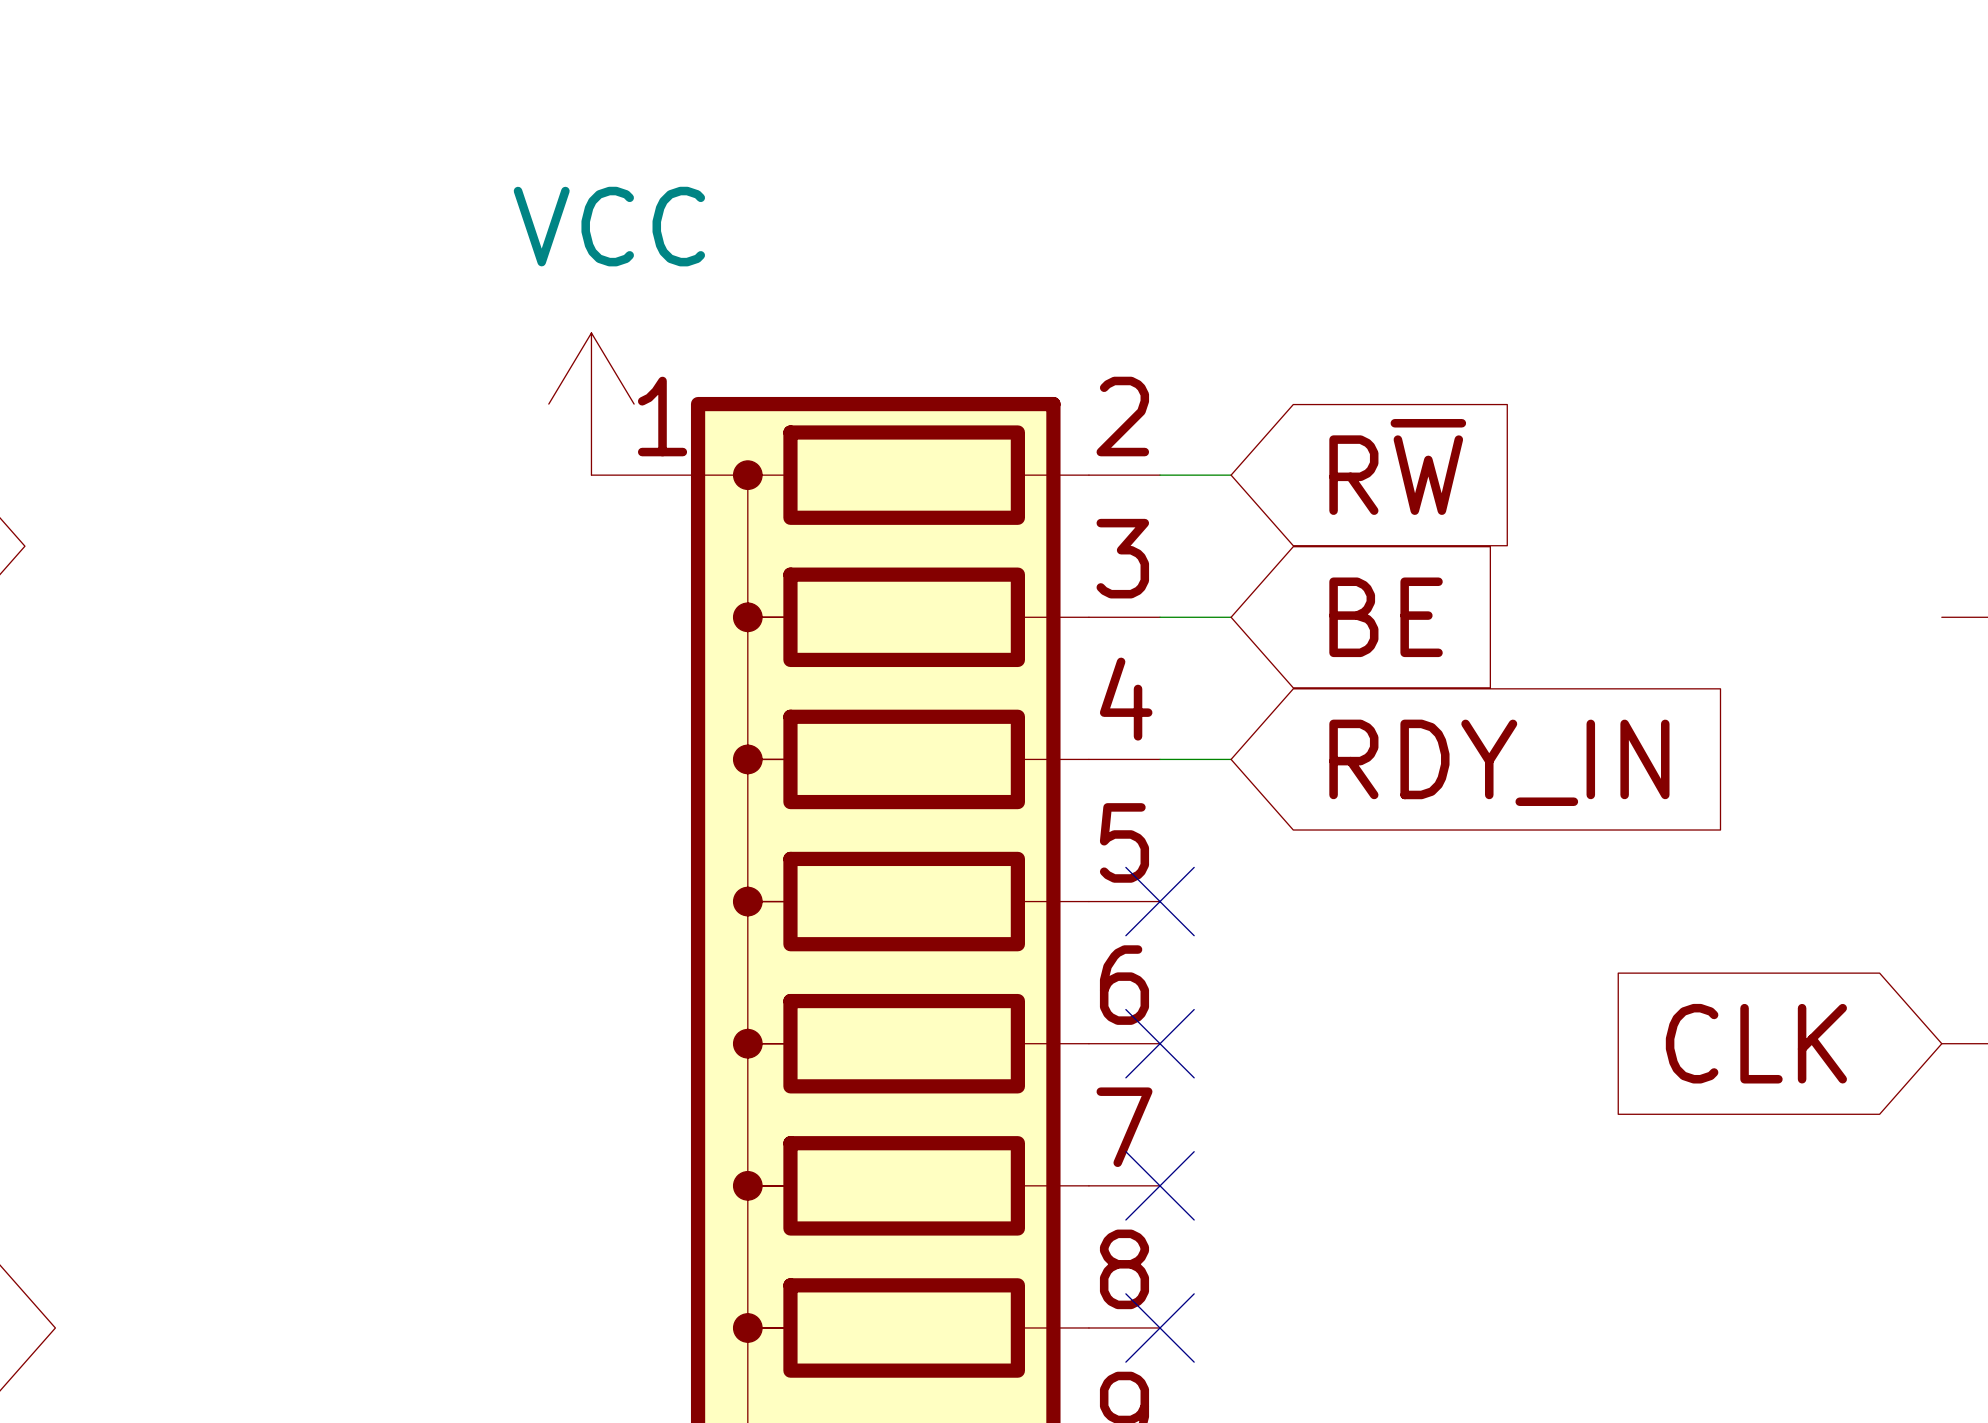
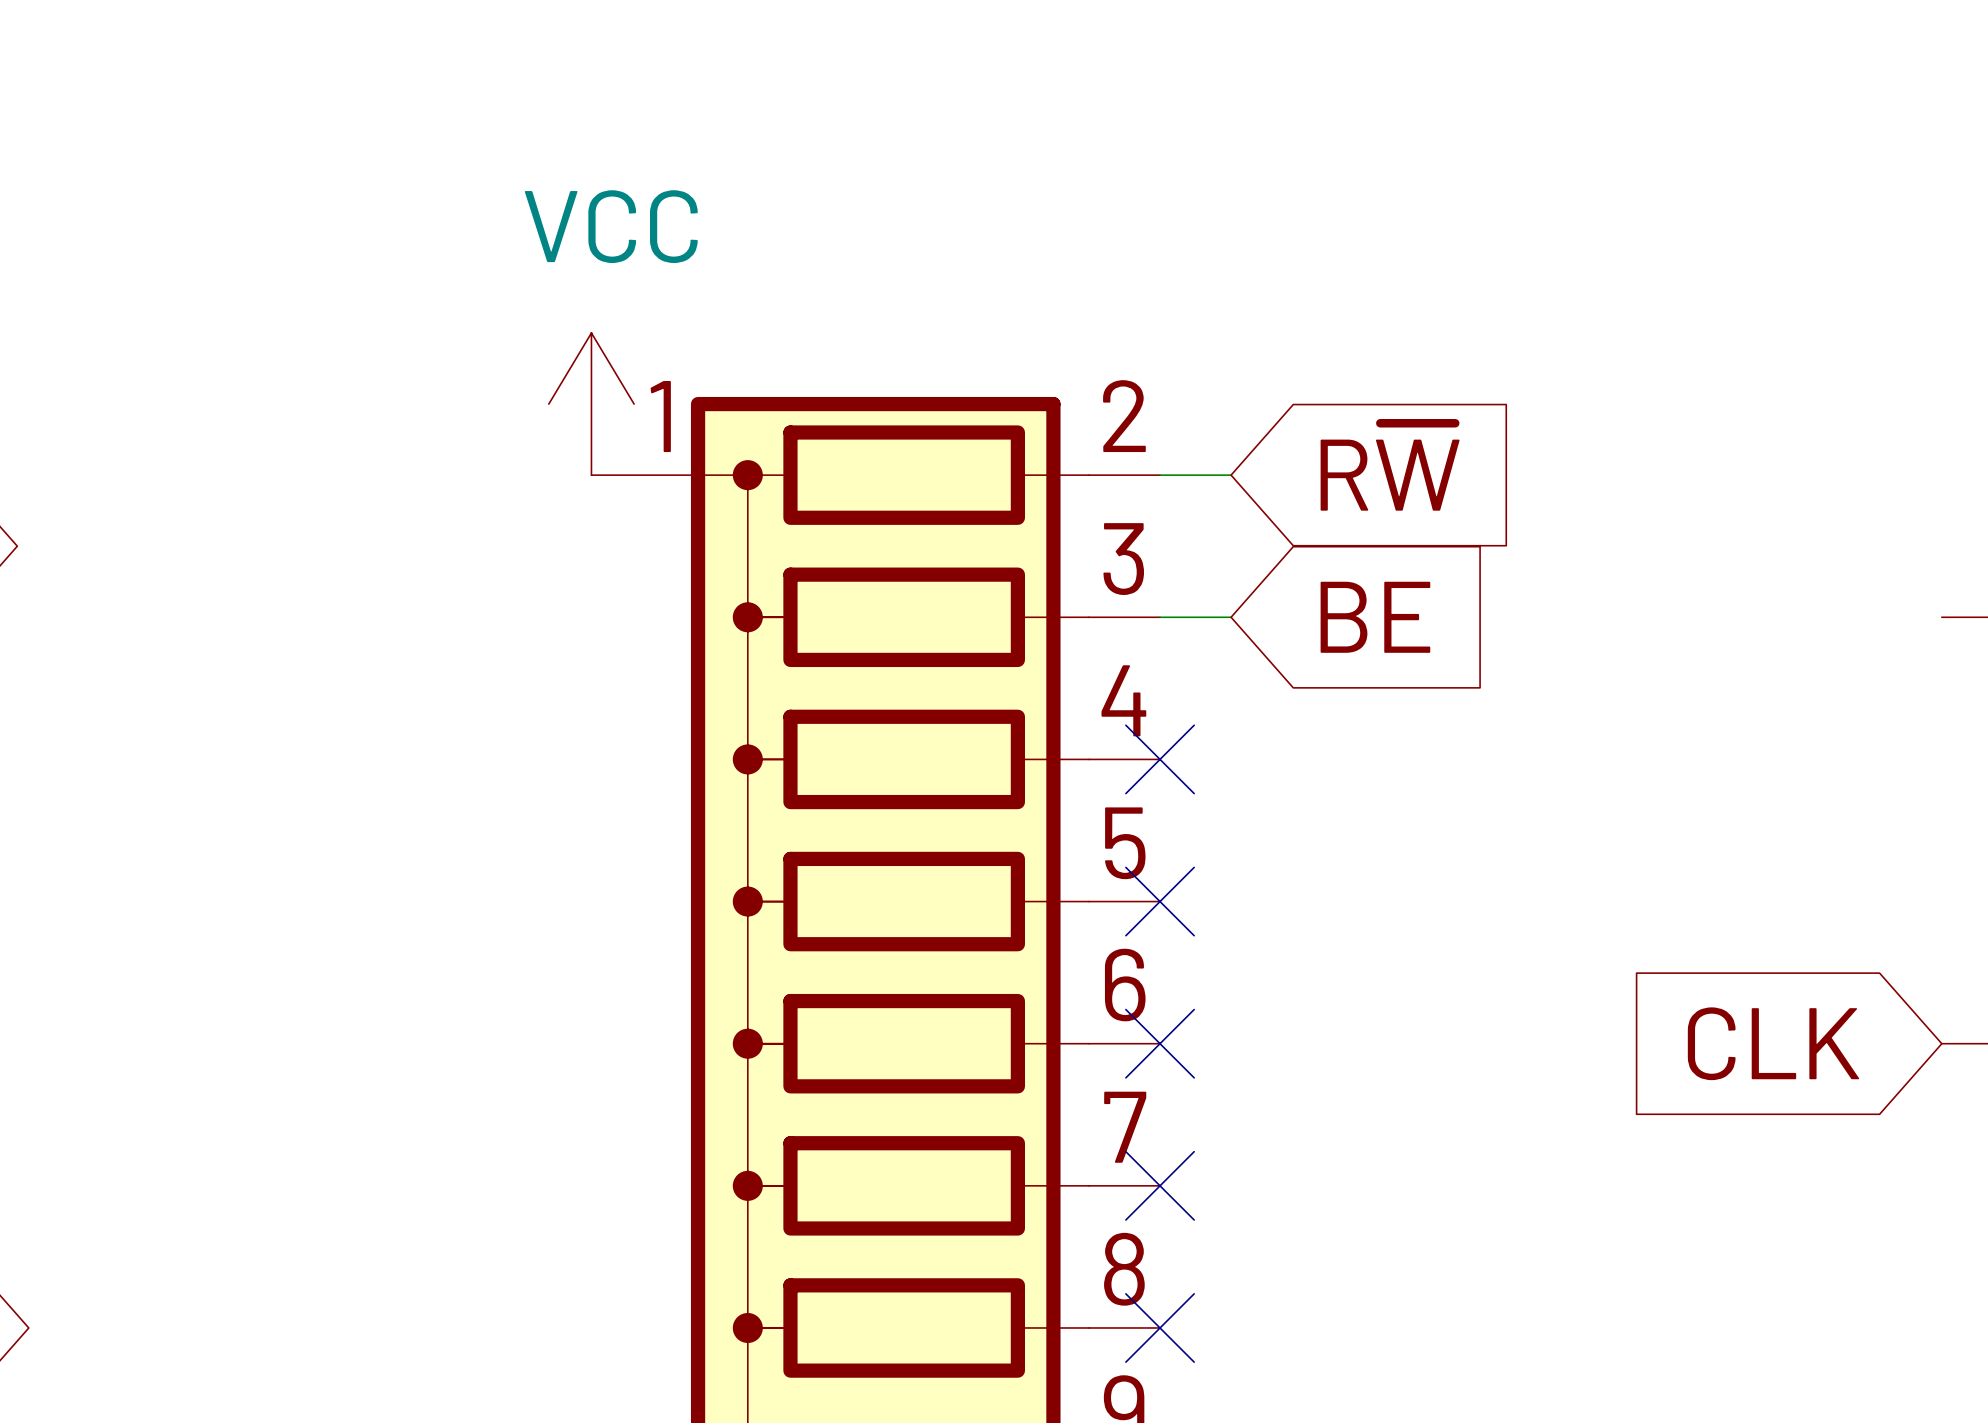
wire: (1160, 759) (1231, 759) -> none
no-connect mark: none -> (1160, 759)
global label: RDY_IN (1499, 762) -> none

